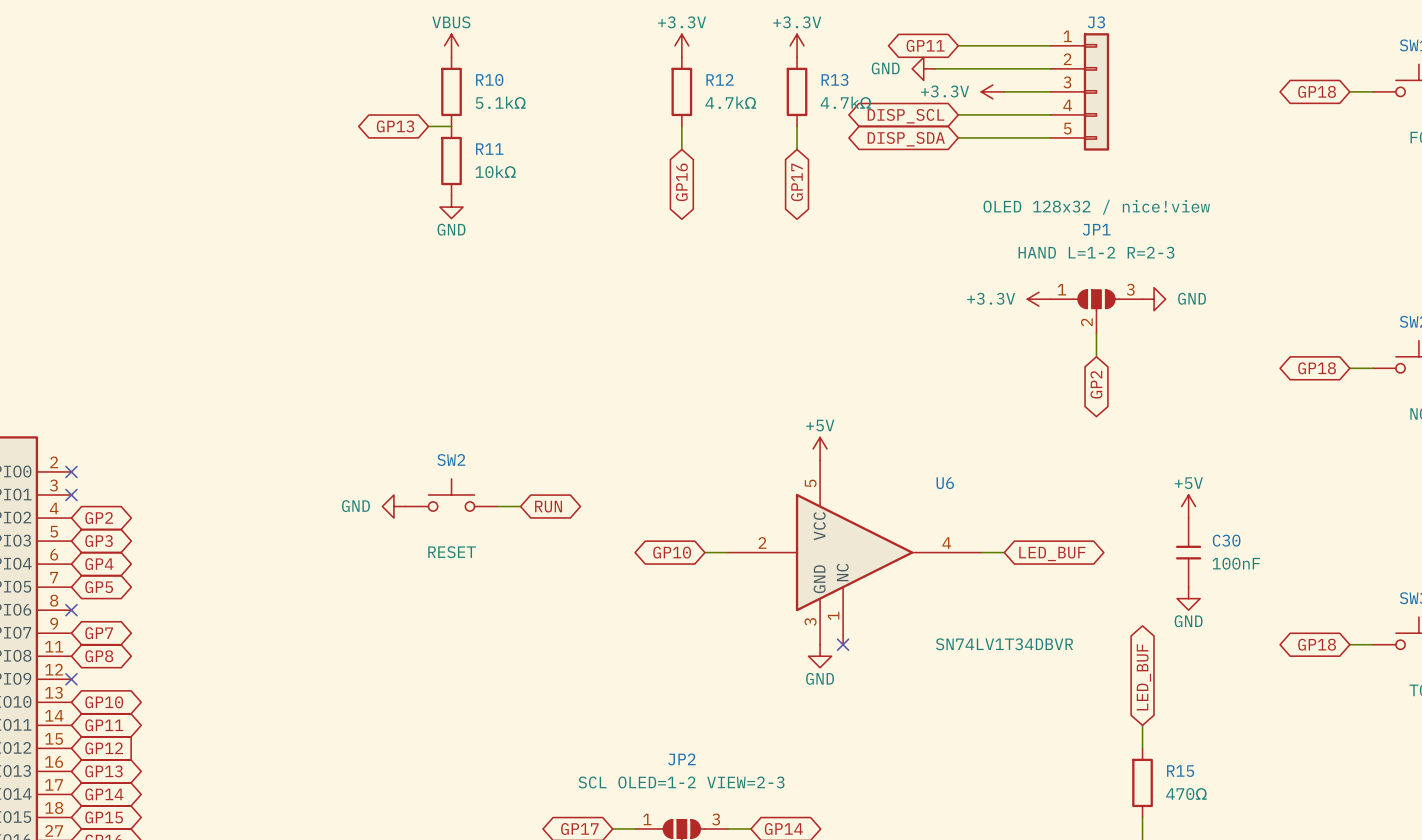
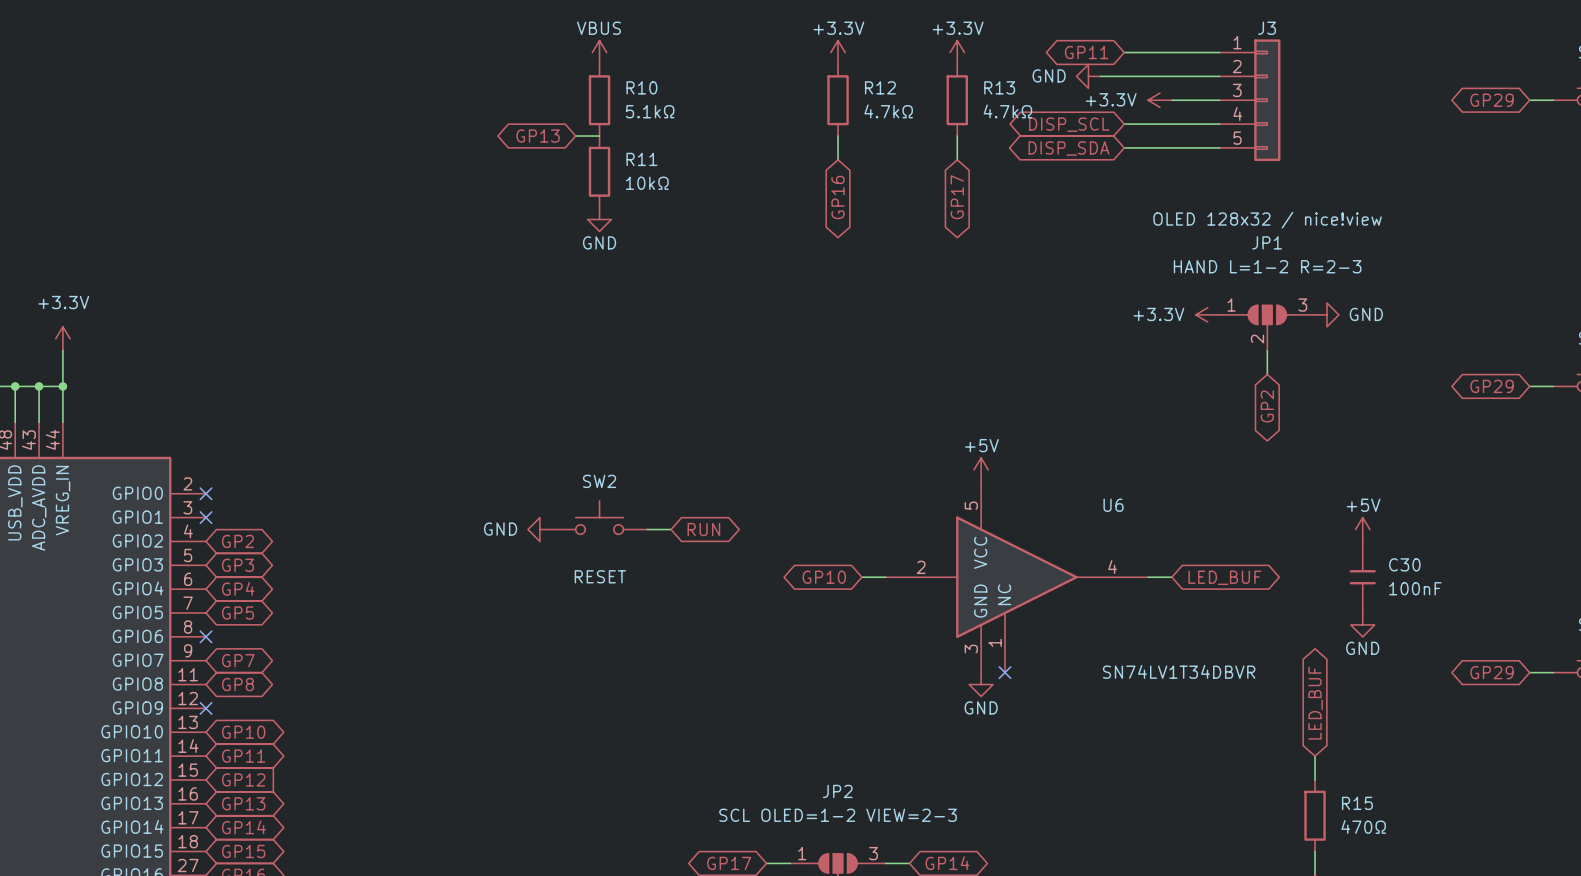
global label: GP18 (1317, 91) -> GP29 (1492, 100)
global label: GP18 (1317, 368) -> GP29 (1492, 386)
global label: GP18 (1317, 644) -> GP29 (1492, 672)

